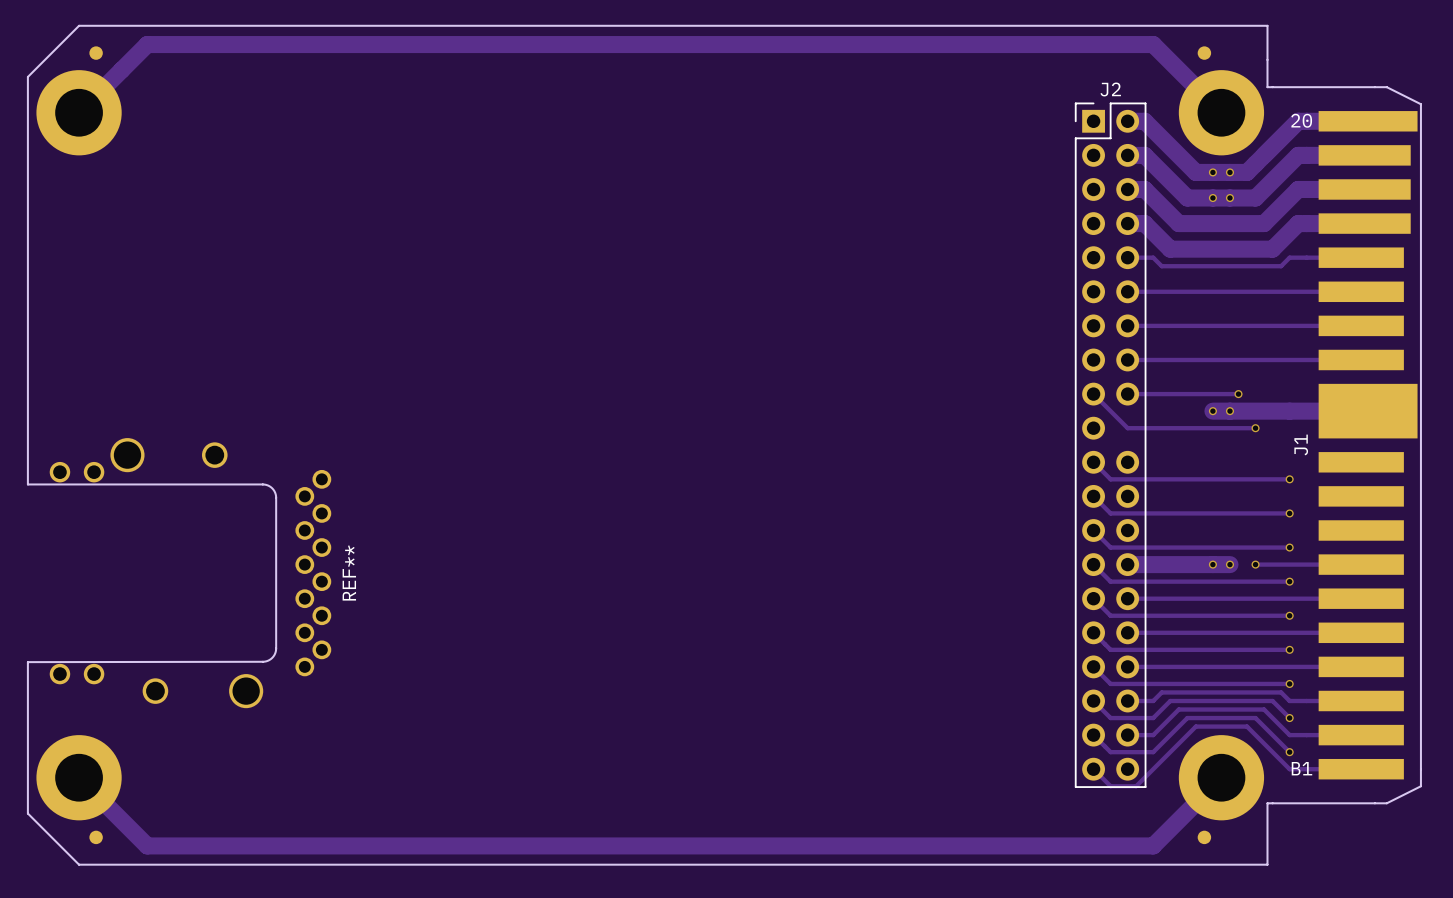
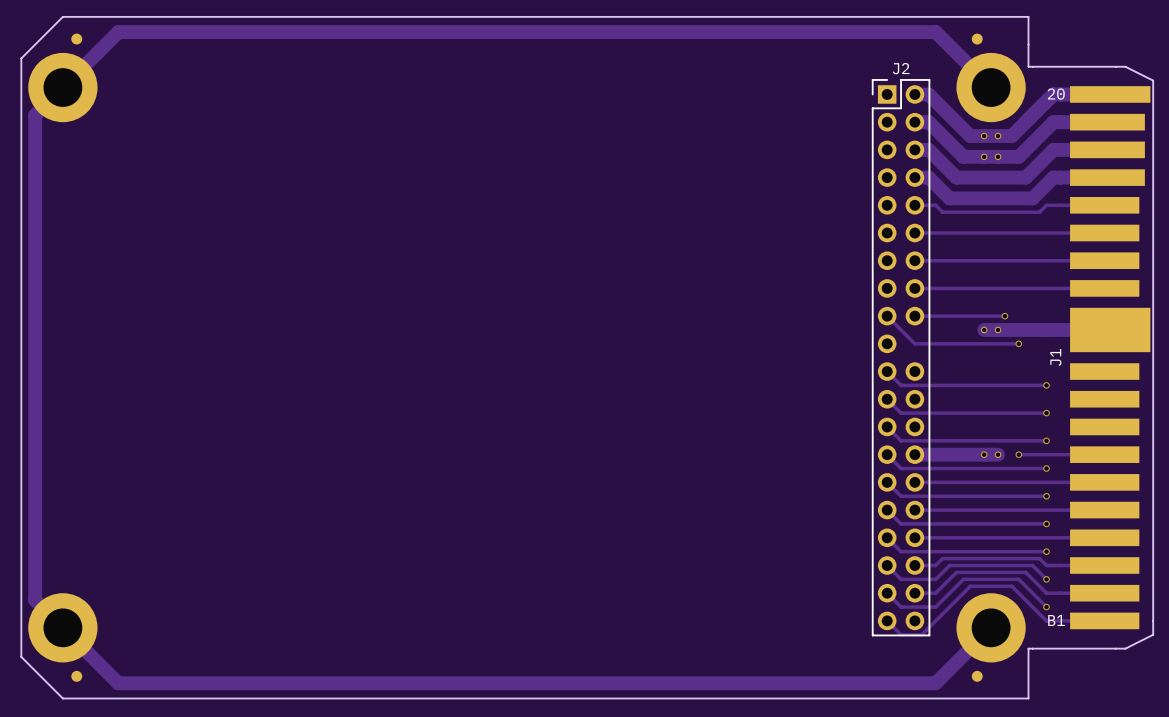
track: none -> (62, 87) (35, 115) (35, 600) (62, 627)
board edge: (27, 484) (262, 484) (272, 488) (276, 497) (276, 648) (274, 655) (269, 660) (262, 661) (27, 662) -> (21, 389) (21, 533)
REF**: (190, 573) -> none

